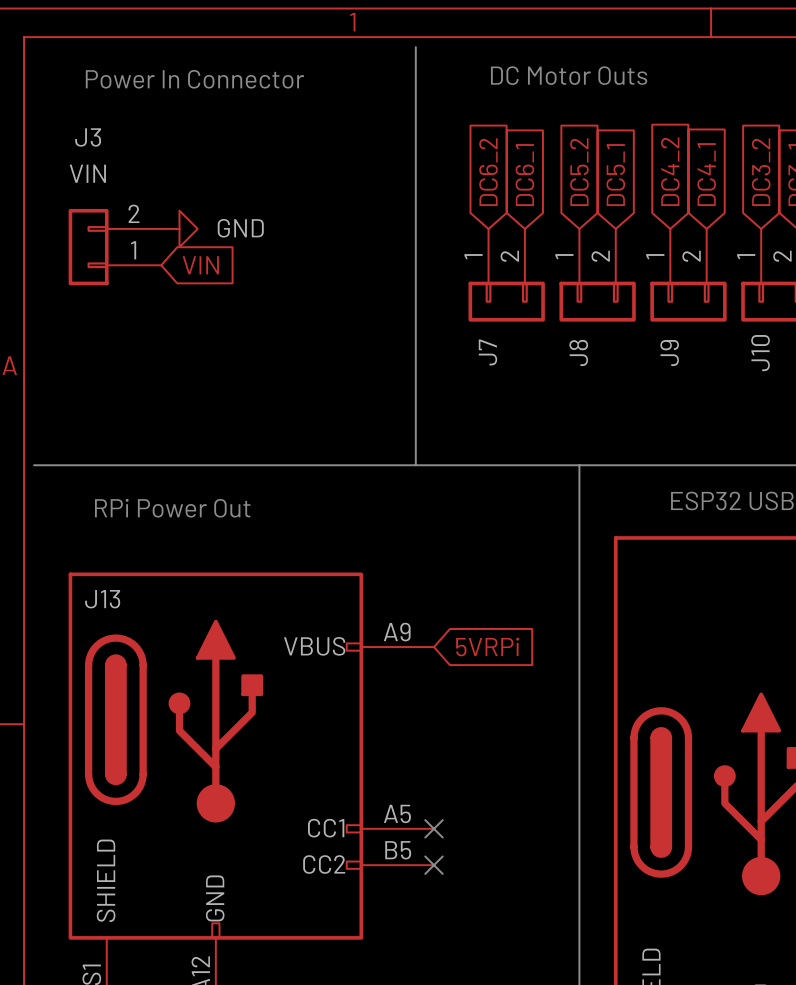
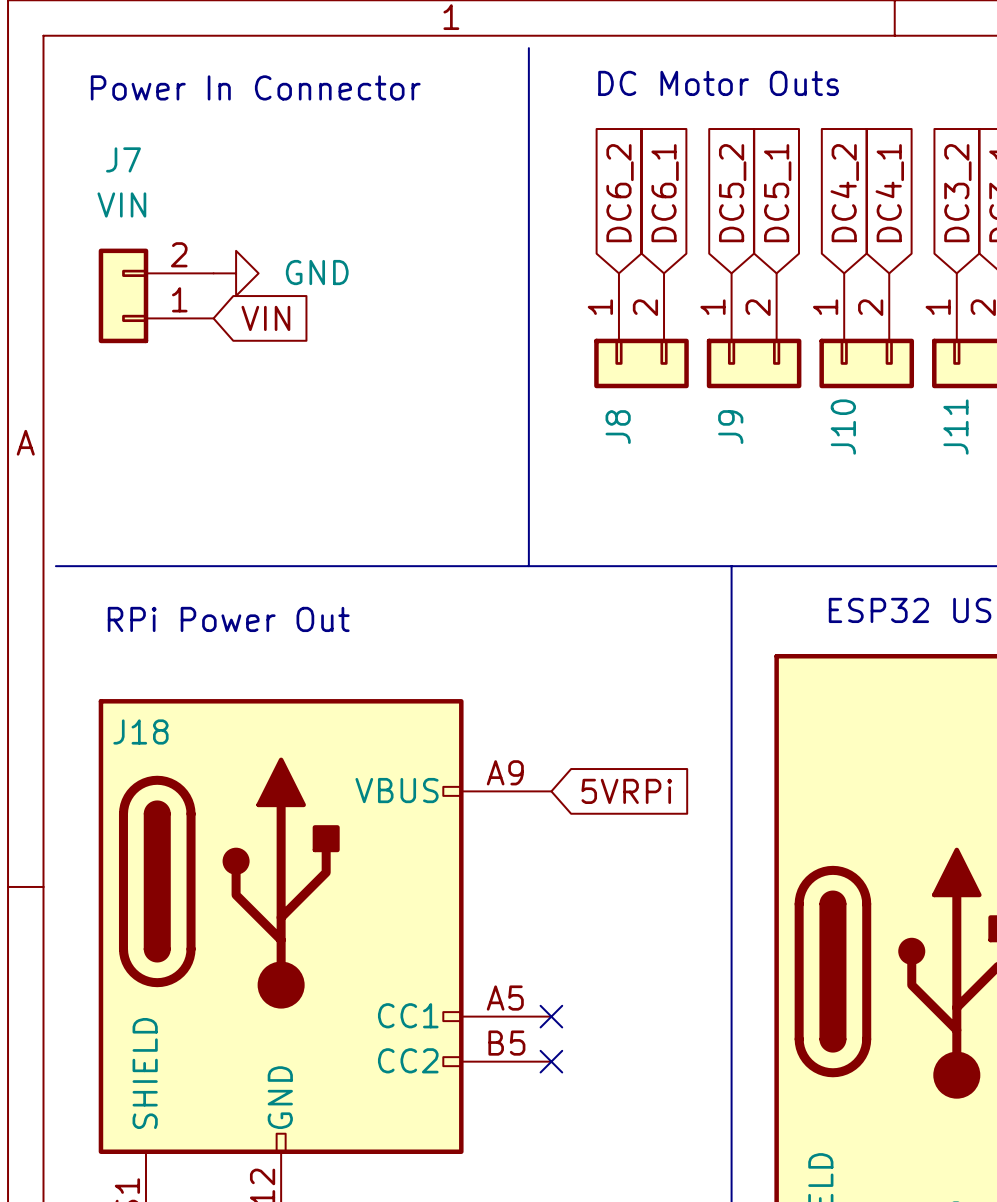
J3 name: J3 (88, 137) -> J7 (123, 159)
J7 name: J7 (487, 352) -> J8 (618, 427)
J8 name: J8 (578, 352) -> J9 (730, 427)
J9 name: J9 (669, 353) -> J10 (843, 427)
J10 name: J10 (760, 353) -> J11 (955, 427)
J13 name: J13 (102, 599) -> J18 (140, 731)

